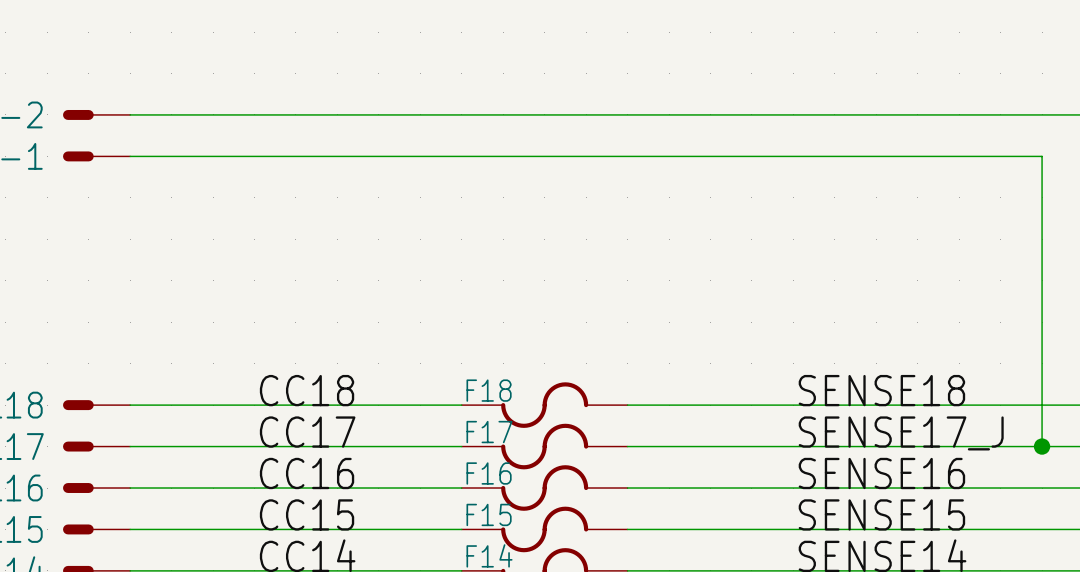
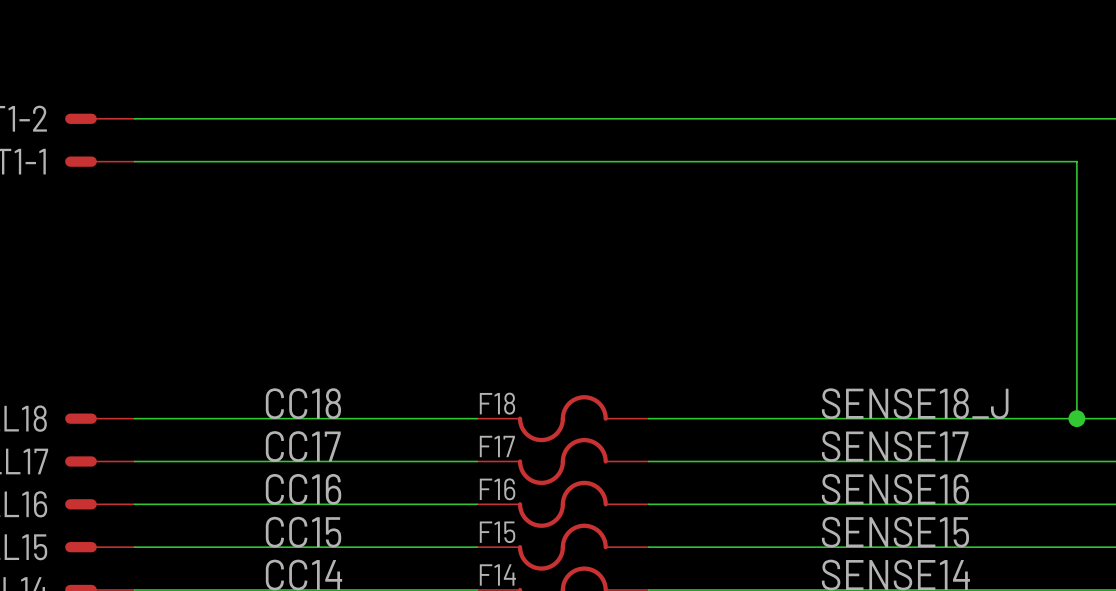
label: SENSE18 (881, 390) -> SENSE18_J (915, 403)
wire: (1042, 405) (1042, 446) -> none
label: SENSE17_J (901, 433) -> SENSE17 (895, 446)
junction position: (1042, 446) -> (1076, 418)

